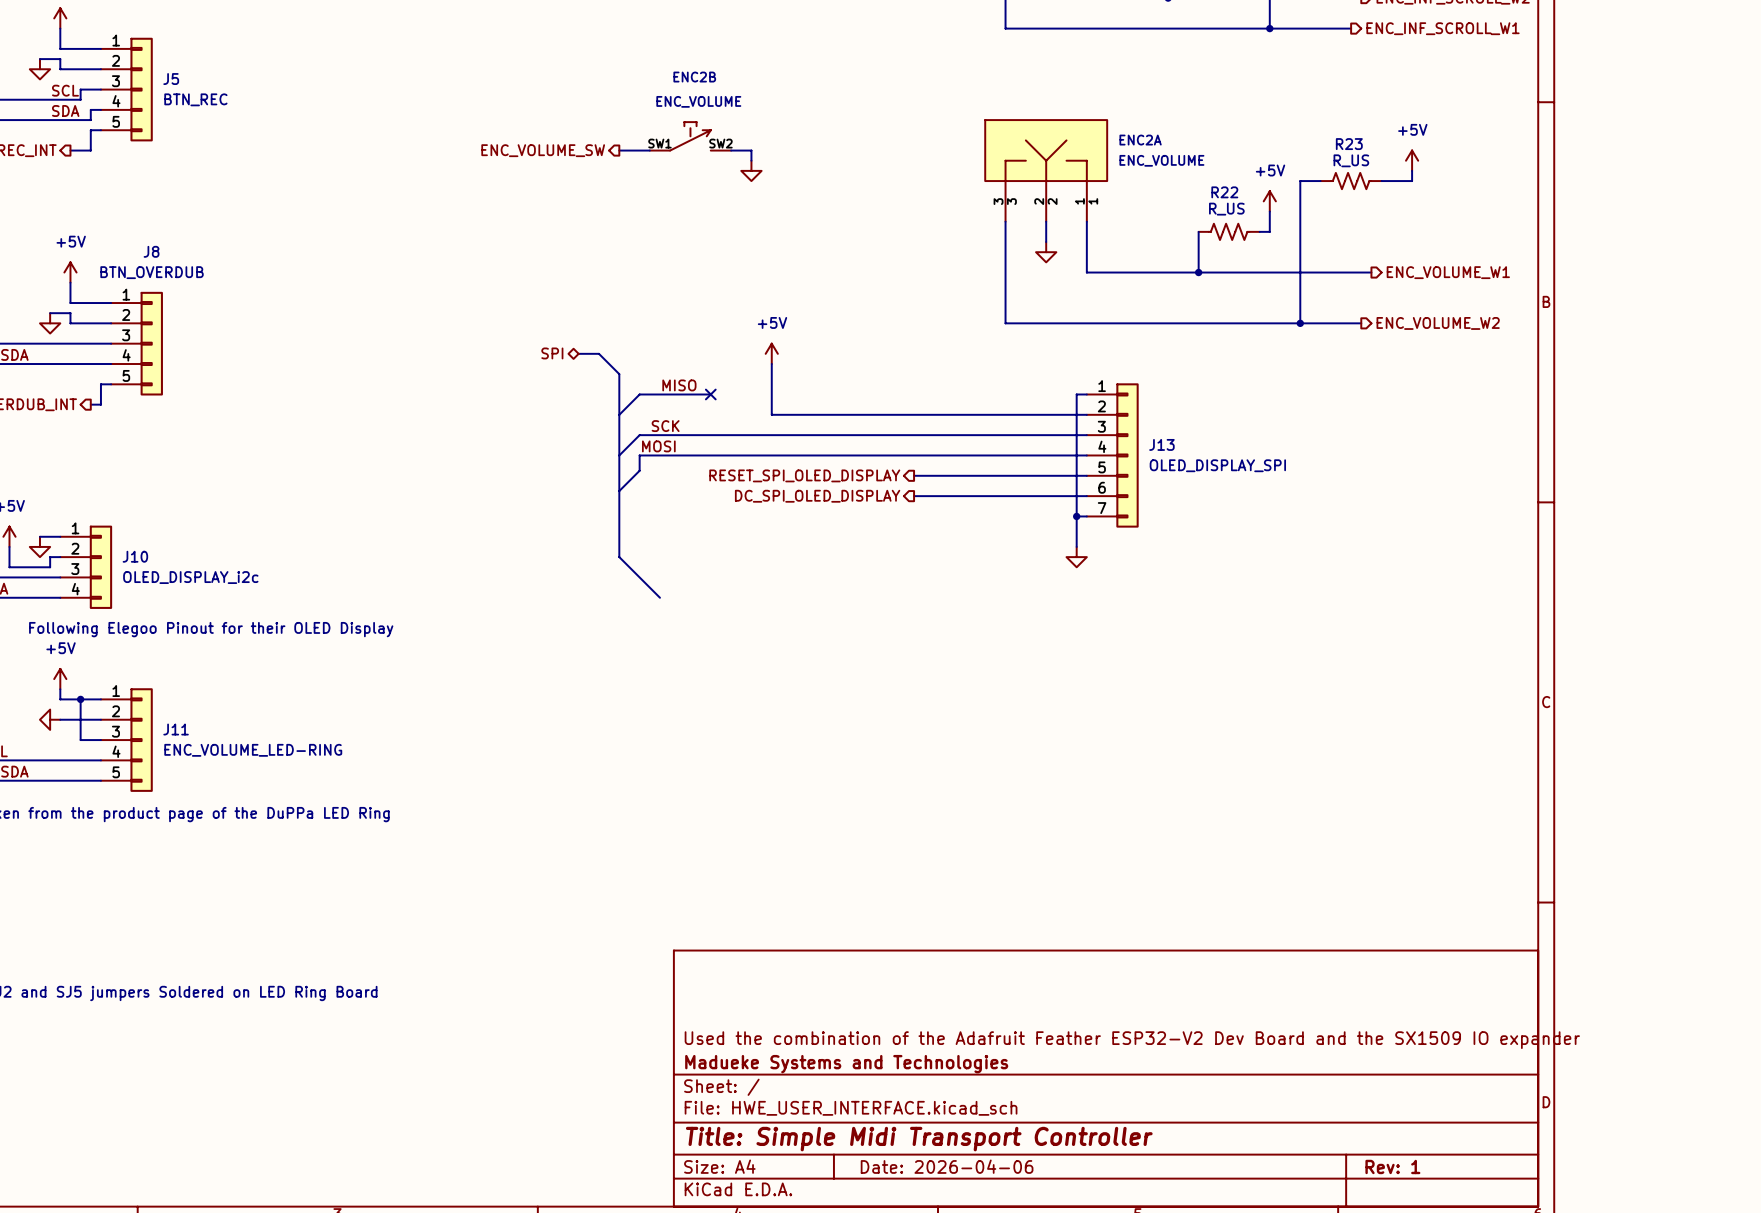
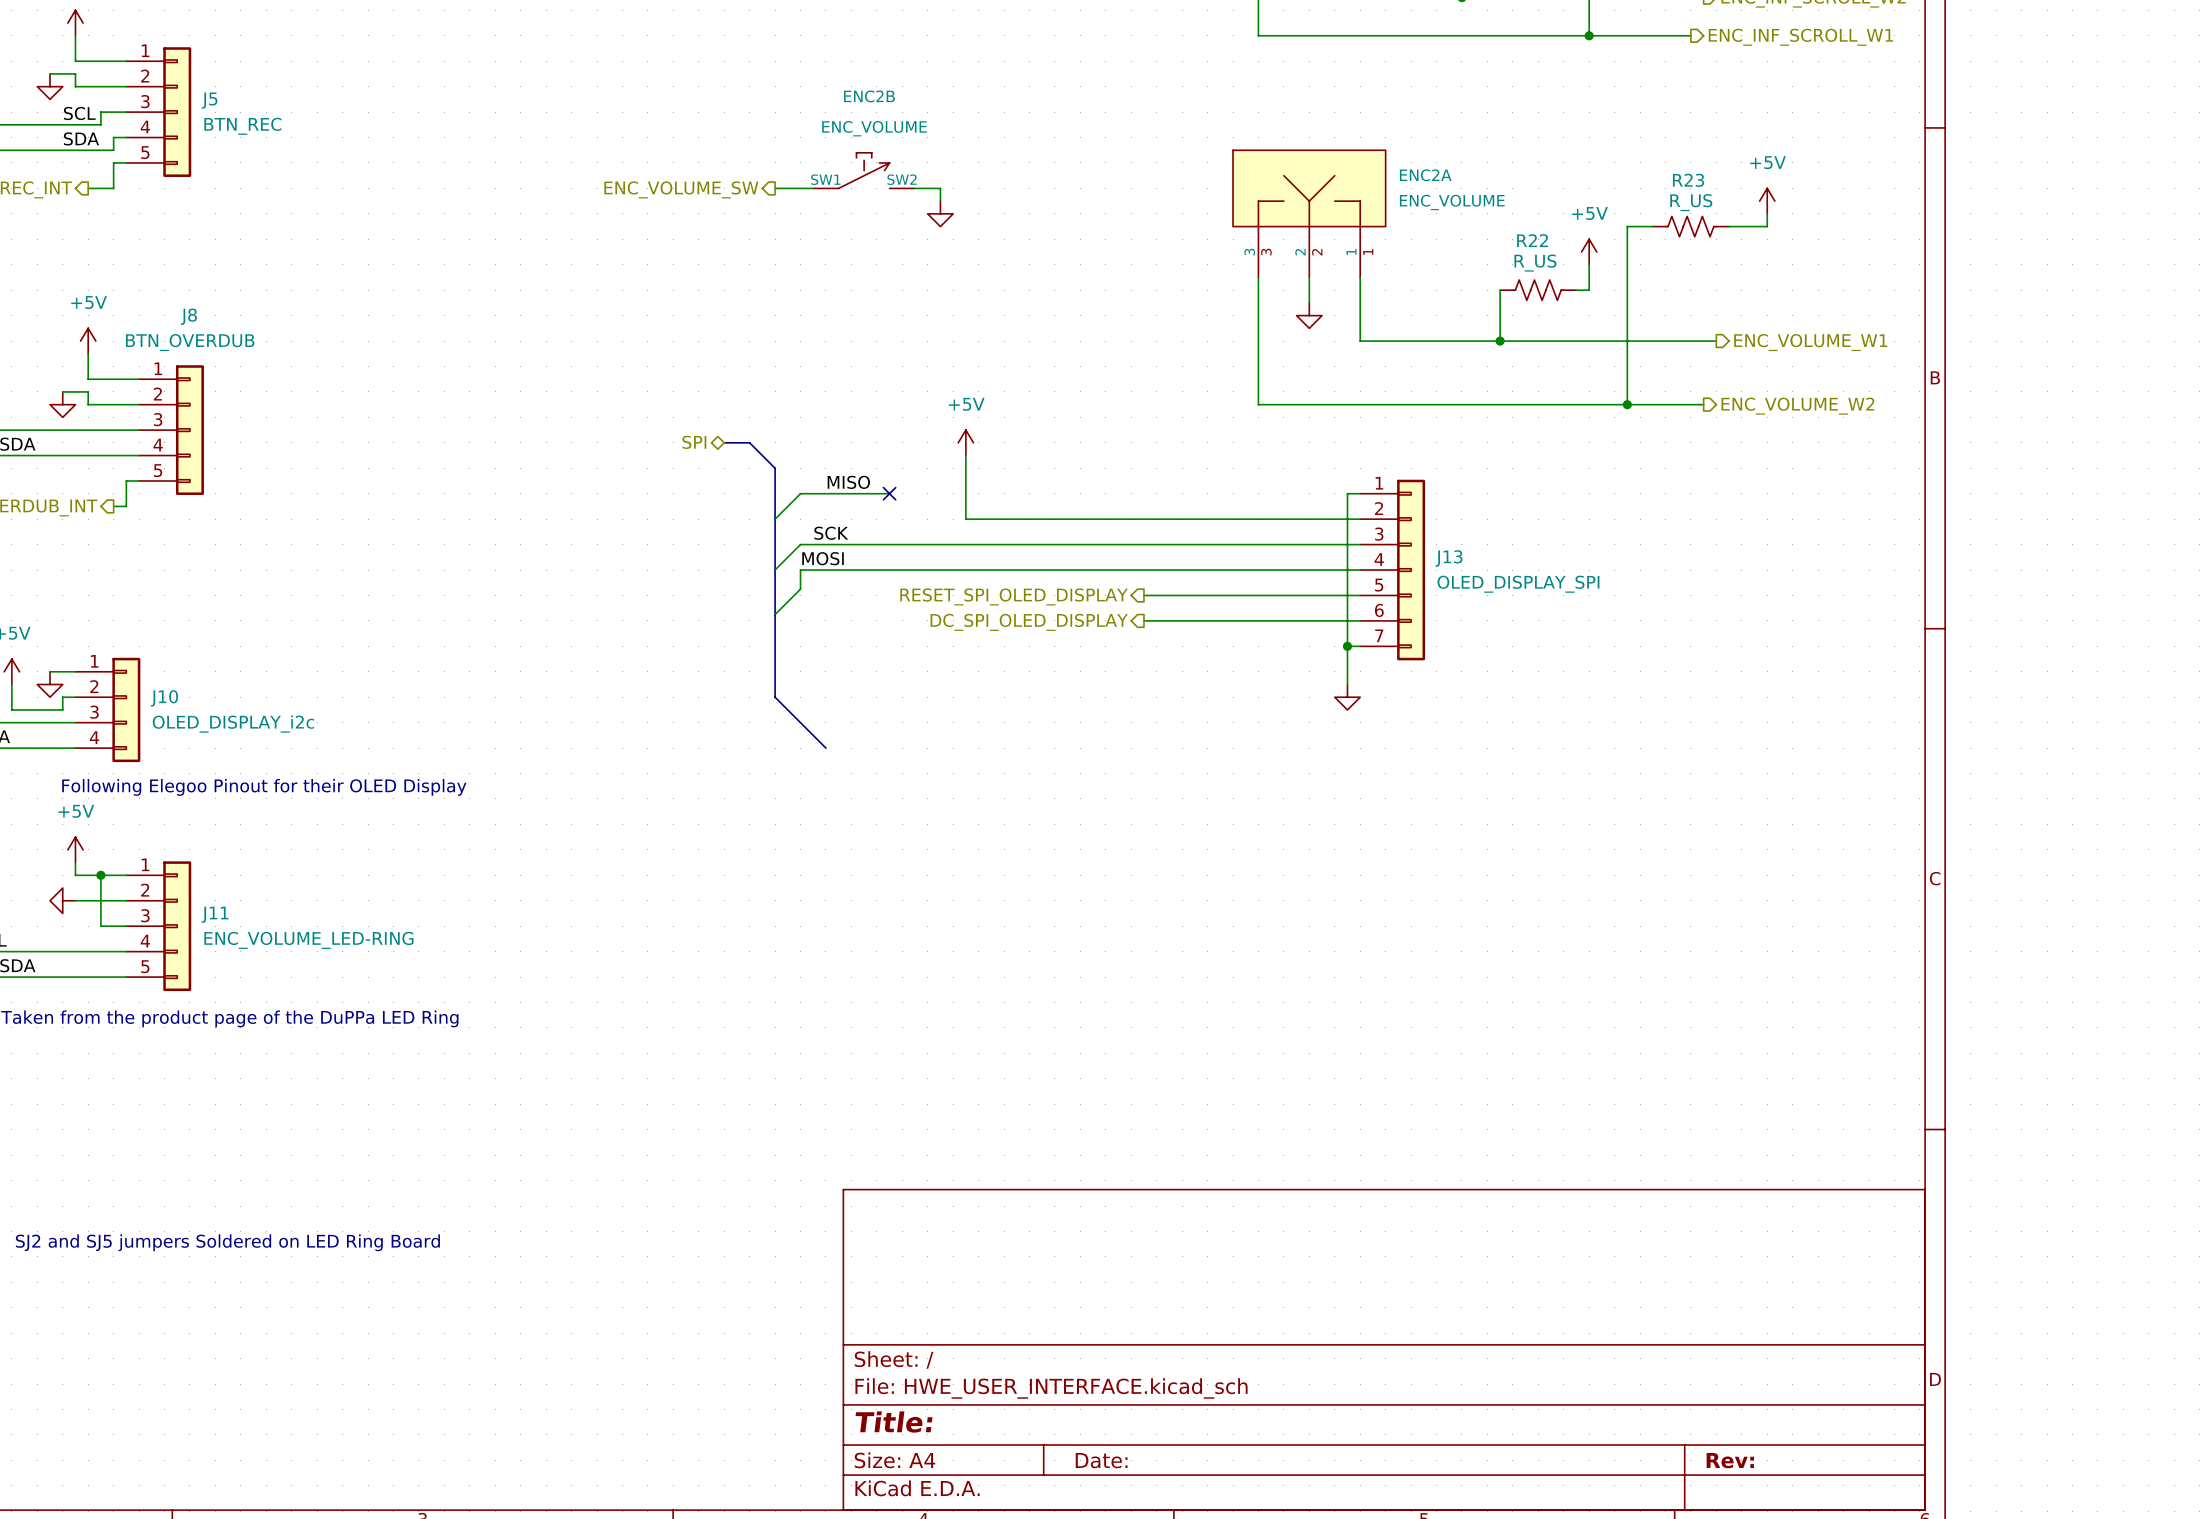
title block: Used the combination of the Adafruit Feather ESP32-V2 Dev Board and the SX1509 IO expander (1132, 1040) -> none
title block: Madueke Systems and Technologies (846, 1064) -> none
title block: Title: Simple Midi Transport Controller (919, 1139) -> Title: (894, 1422)
title block: Date: 2026-04-06 (947, 1166) -> Date: (1101, 1460)
title block: Rev: 1 (1392, 1166) -> Rev: (1730, 1460)

